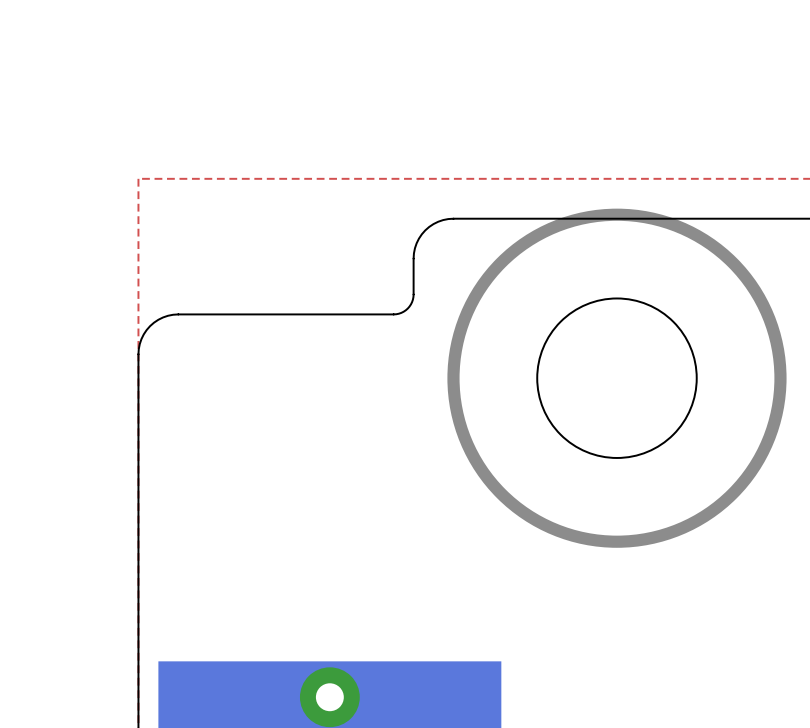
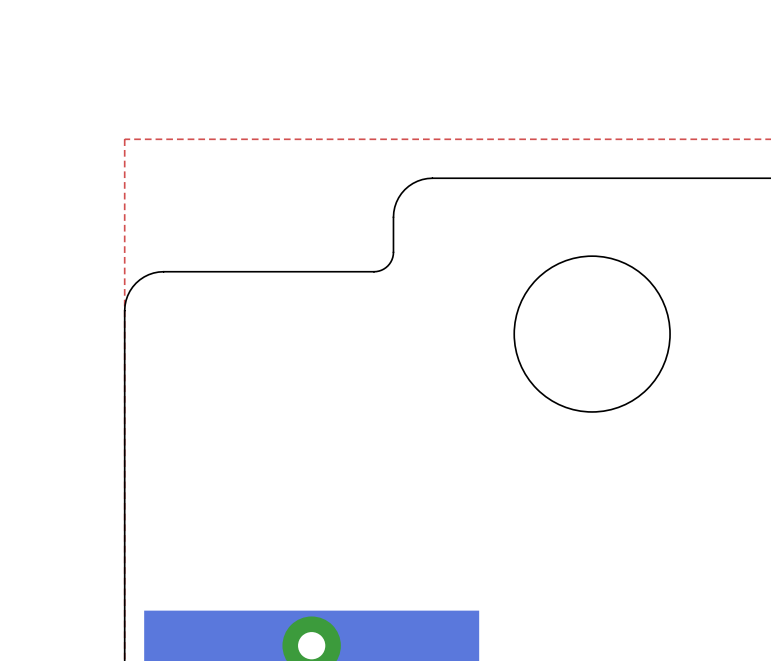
drawing: [447, 208, 787, 548] -> none

